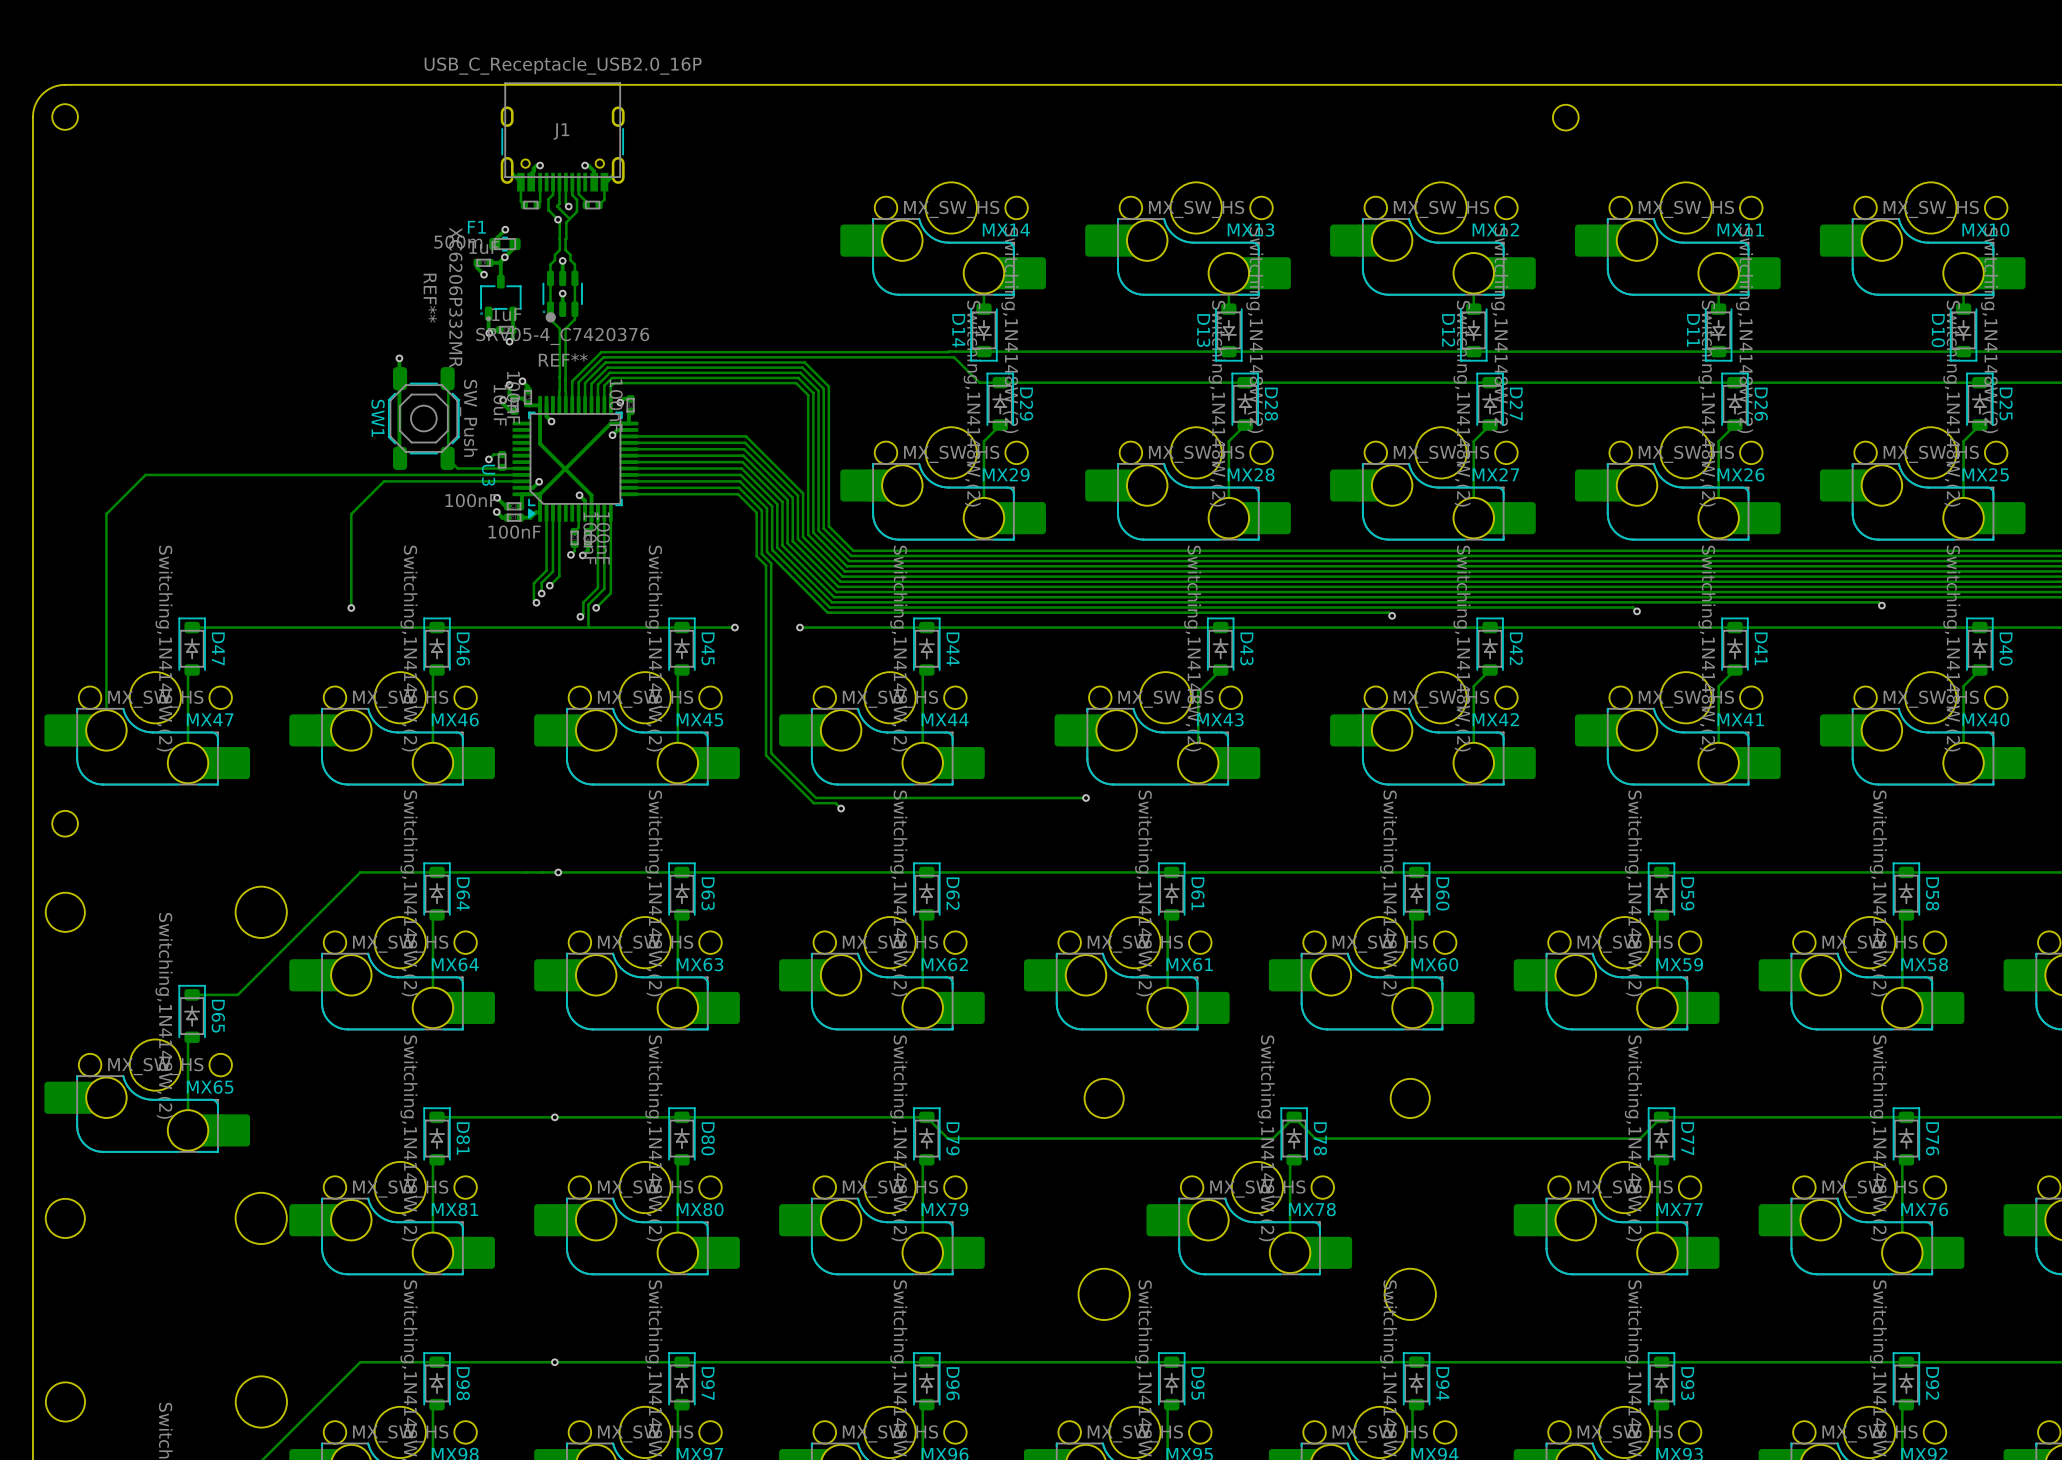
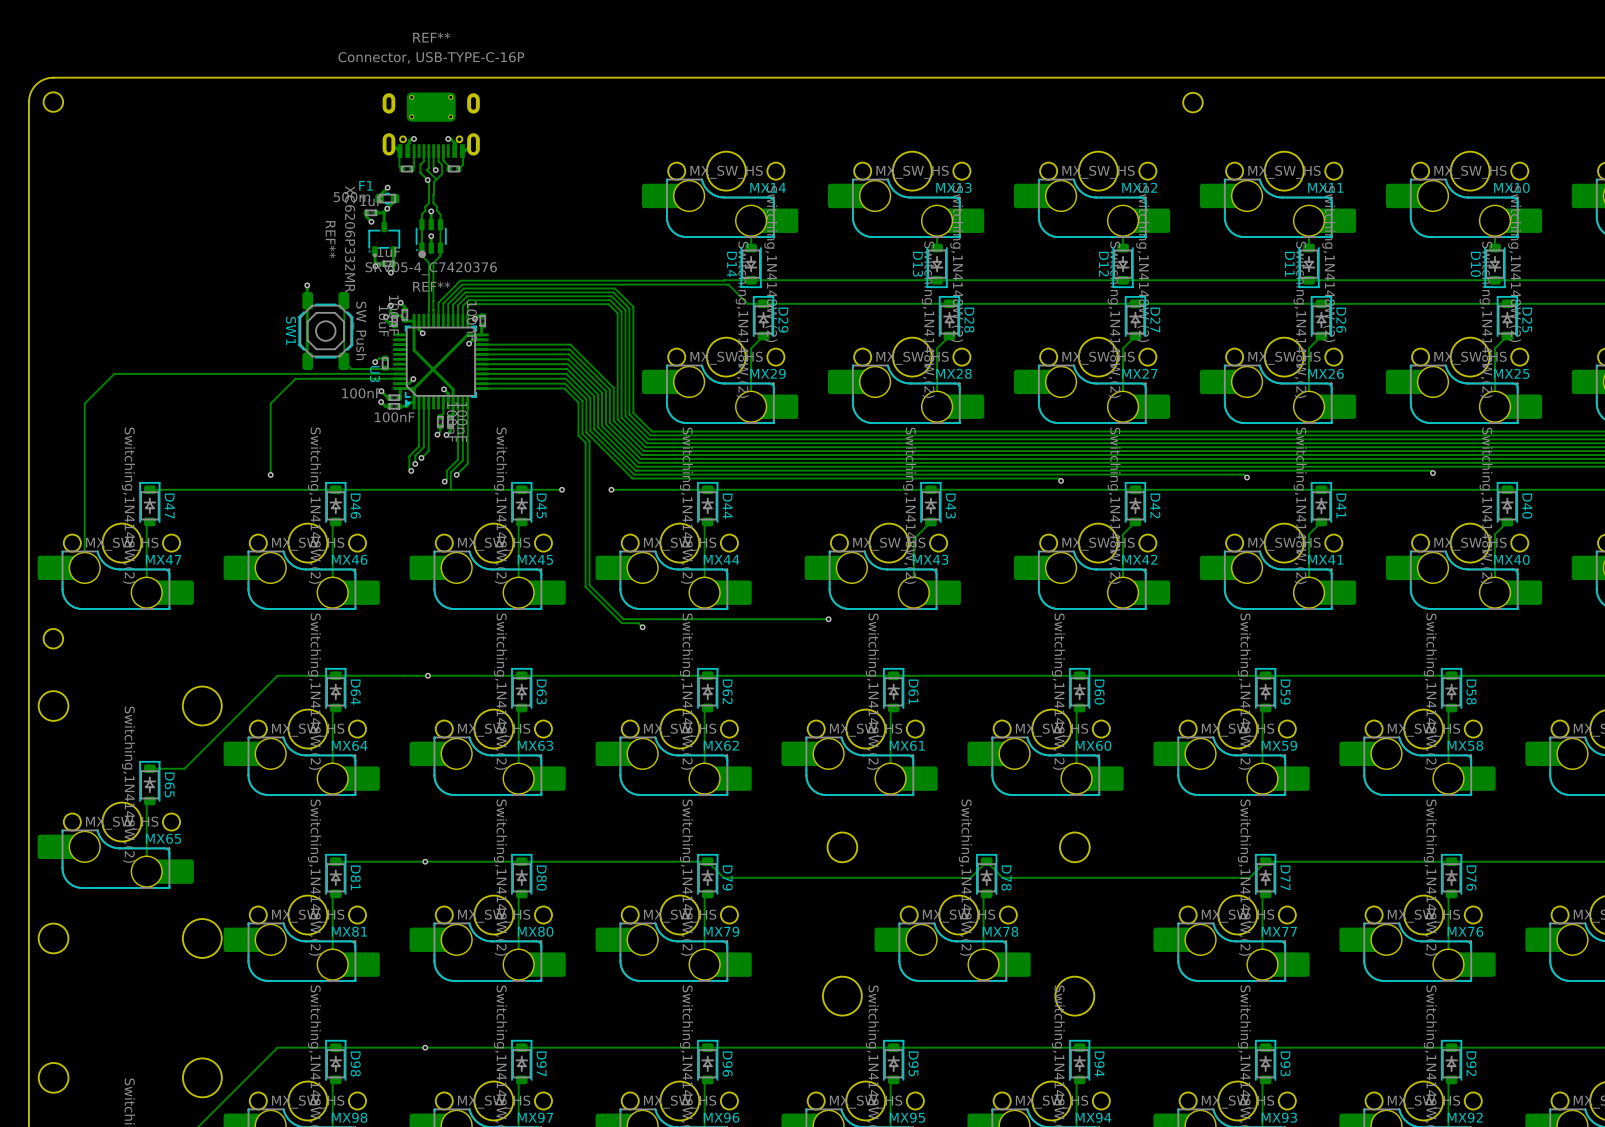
J1: USB_C_Receptacle_USB2.0_16P (562, 137) -> none
part: none -> Connector, USB-TYPE-C-16P (431, 125)

